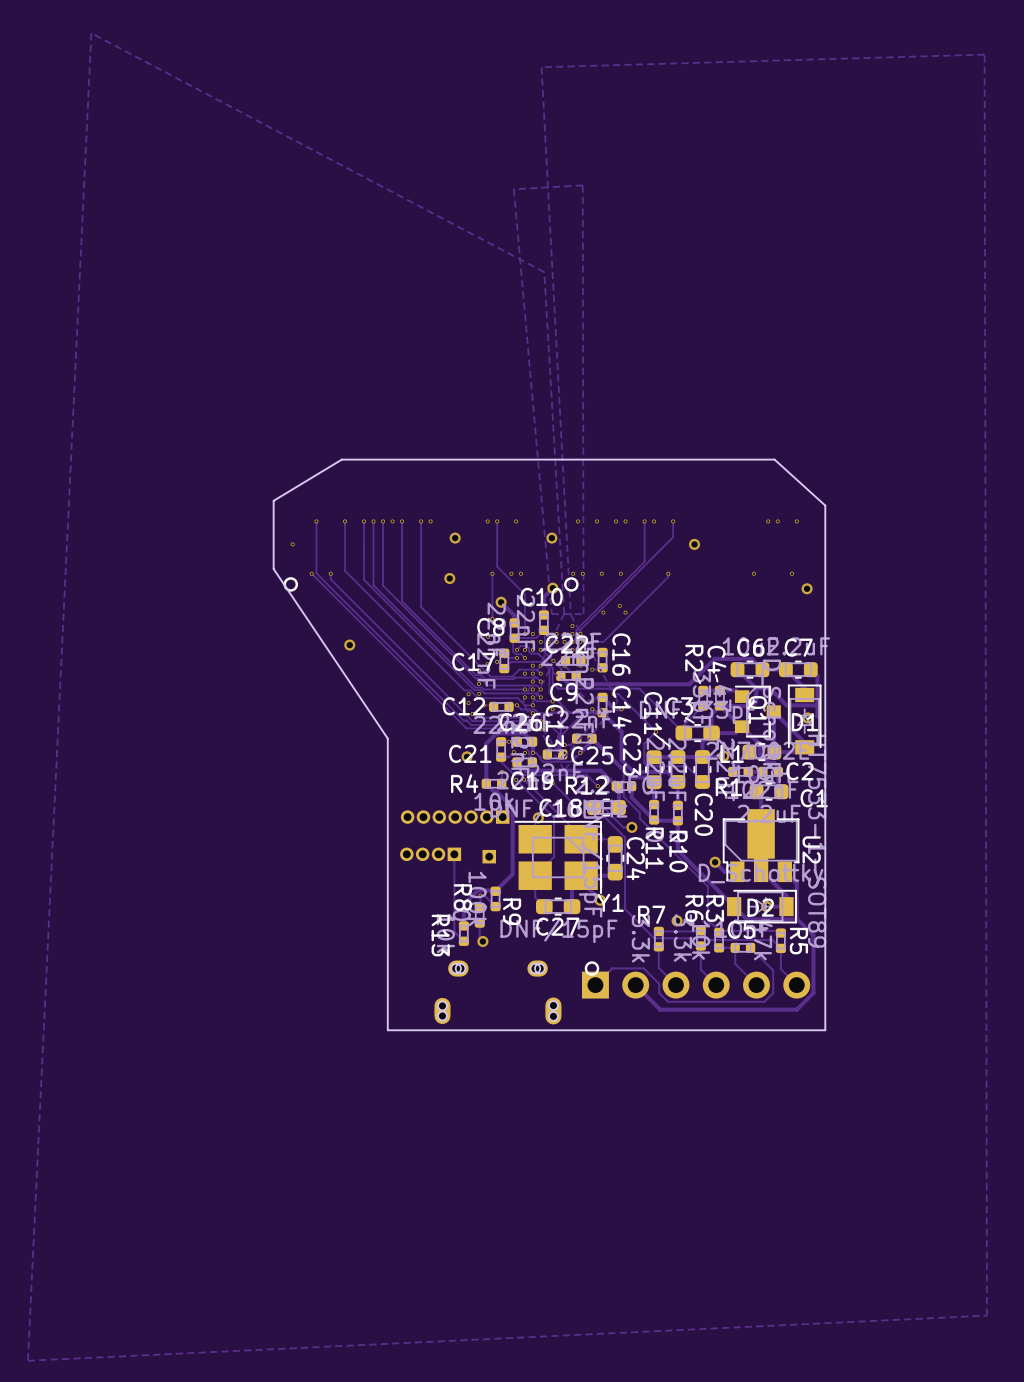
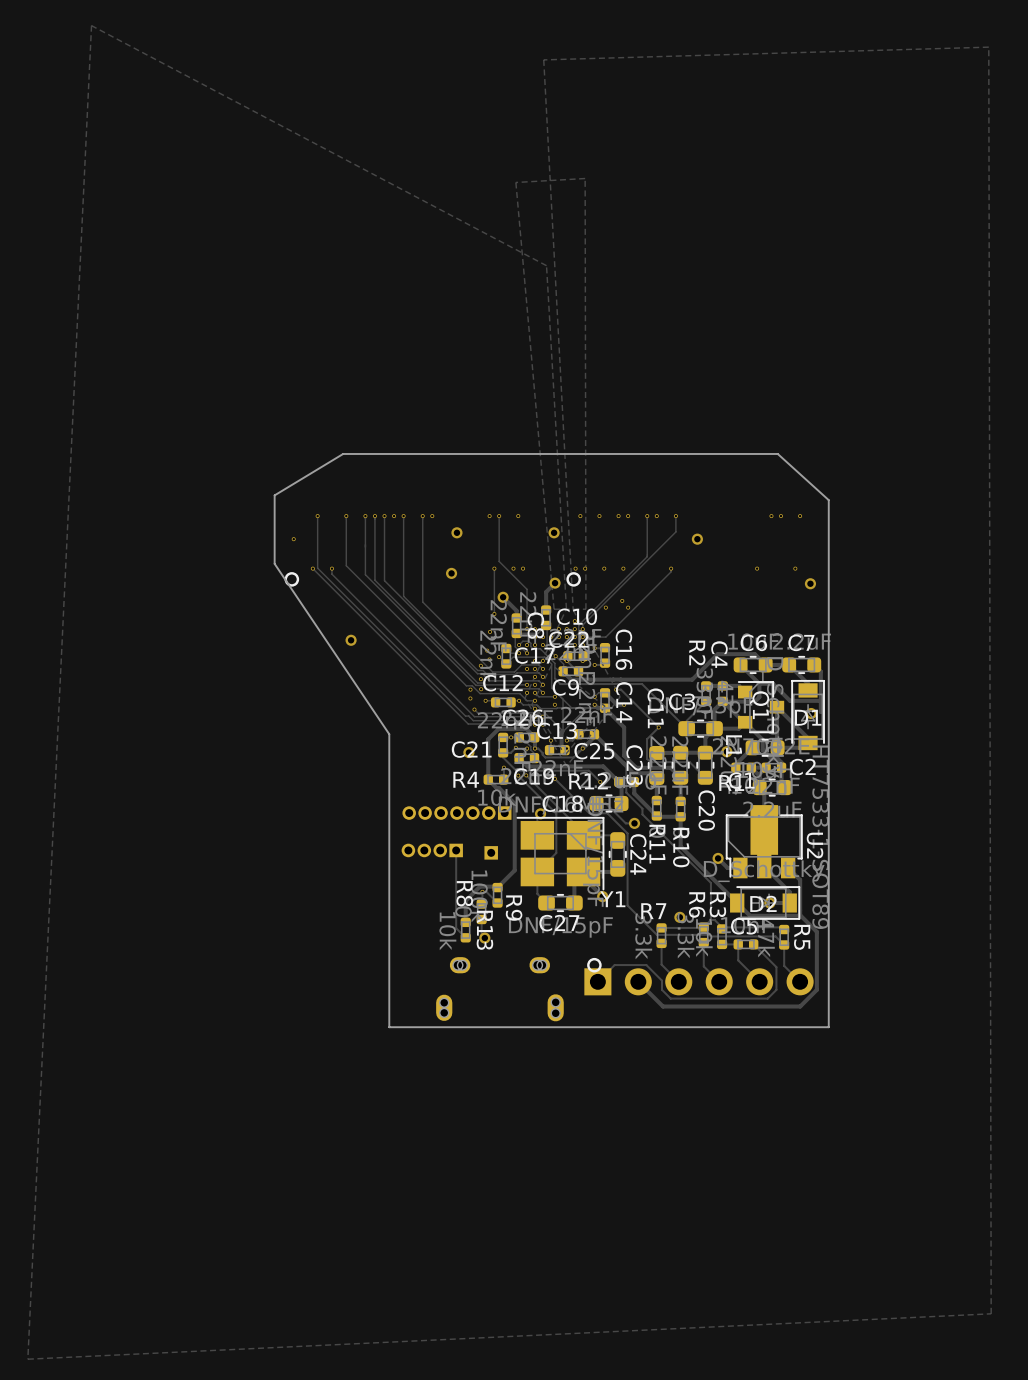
C10 name position: C10 (541, 596) -> C10 (576, 616)
C8 name rotation: 0° (490, 627) -> 90° clockwise (535, 625)
C8 name position: C8 (490, 627) -> C8 (535, 625)
C17 name position: C17 (473, 661) -> C17 (534, 655)
line: (695, 673) (700, 683) -> none
line: (715, 675) (717, 681) -> none
C12 name position: C12 (463, 706) -> C12 (502, 683)
line: (685, 717) (693, 722) -> none
C13 name rotation: 0° (554, 725) -> 90° counterclockwise (557, 730)
line: (654, 733) (669, 746) -> none
L1 name rotation: 0° (732, 753) -> 90° clockwise (734, 746)
C23 name position: C23 (632, 754) -> C23 (634, 765)
C1 name position: C1 (814, 798) -> C1 (741, 780)
R13 name position: R13 (440, 935) -> R13 (484, 930)

